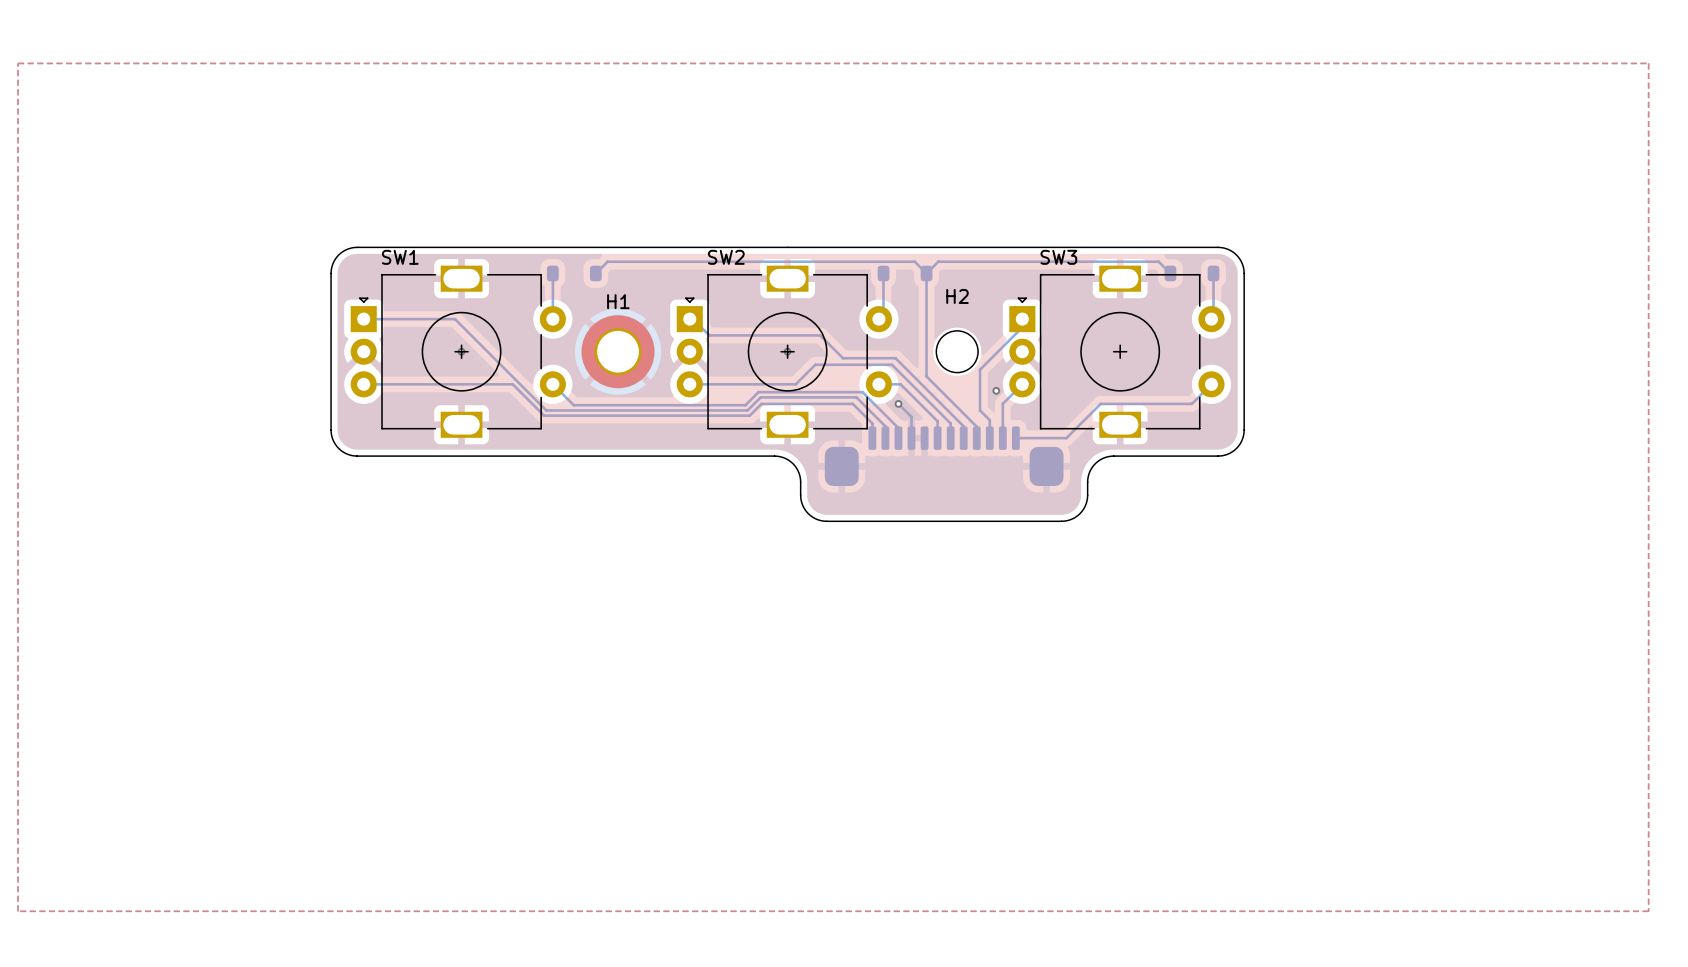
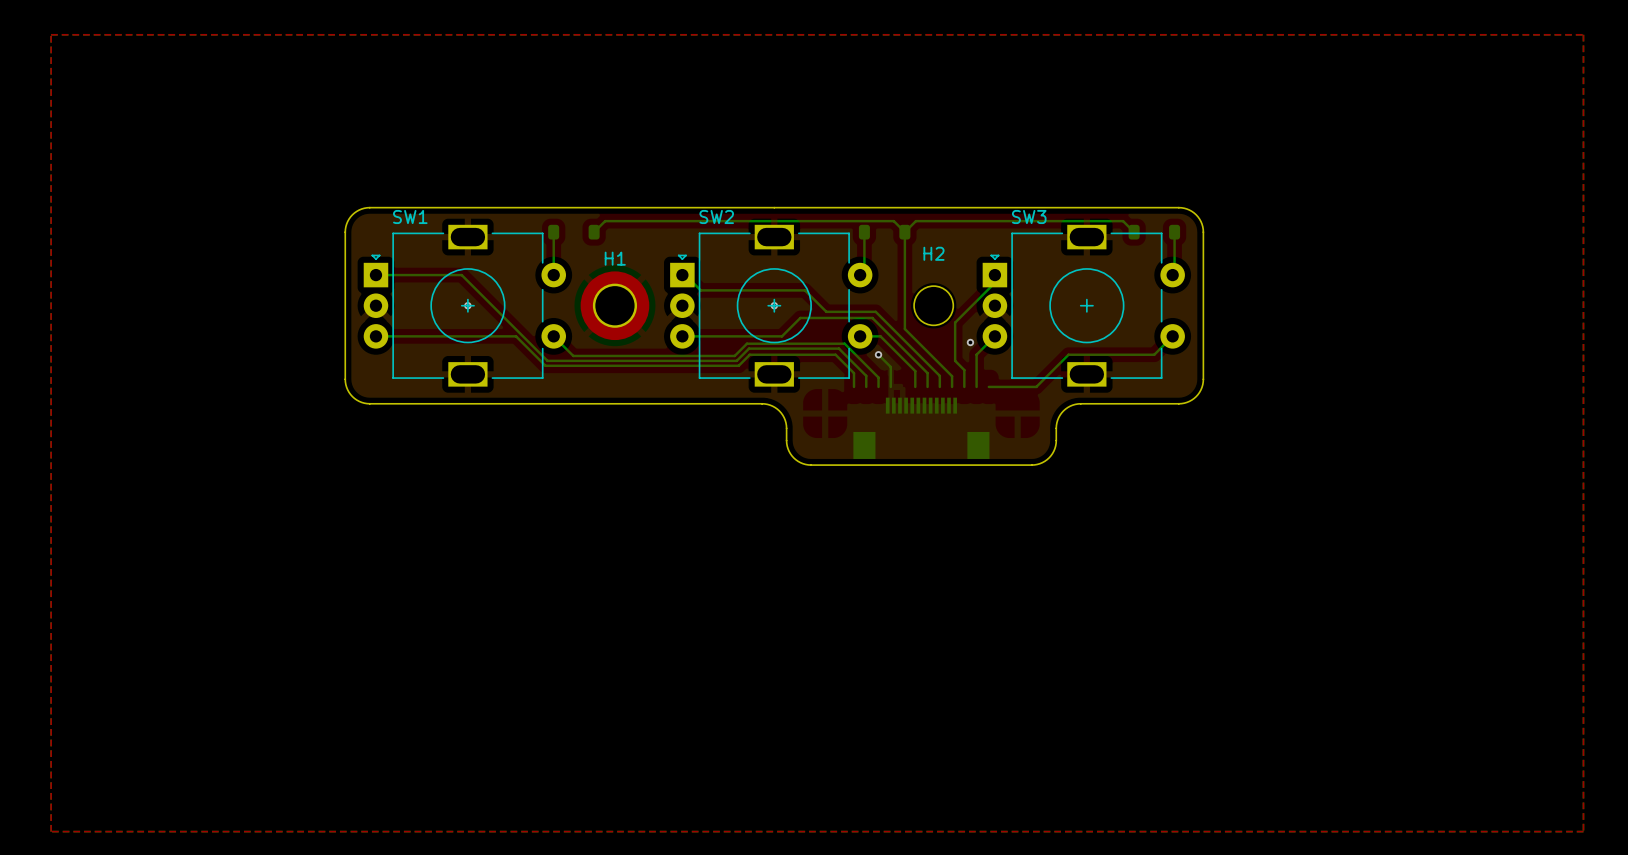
part: (944, 456) -> none
part: none -> (921, 428)

